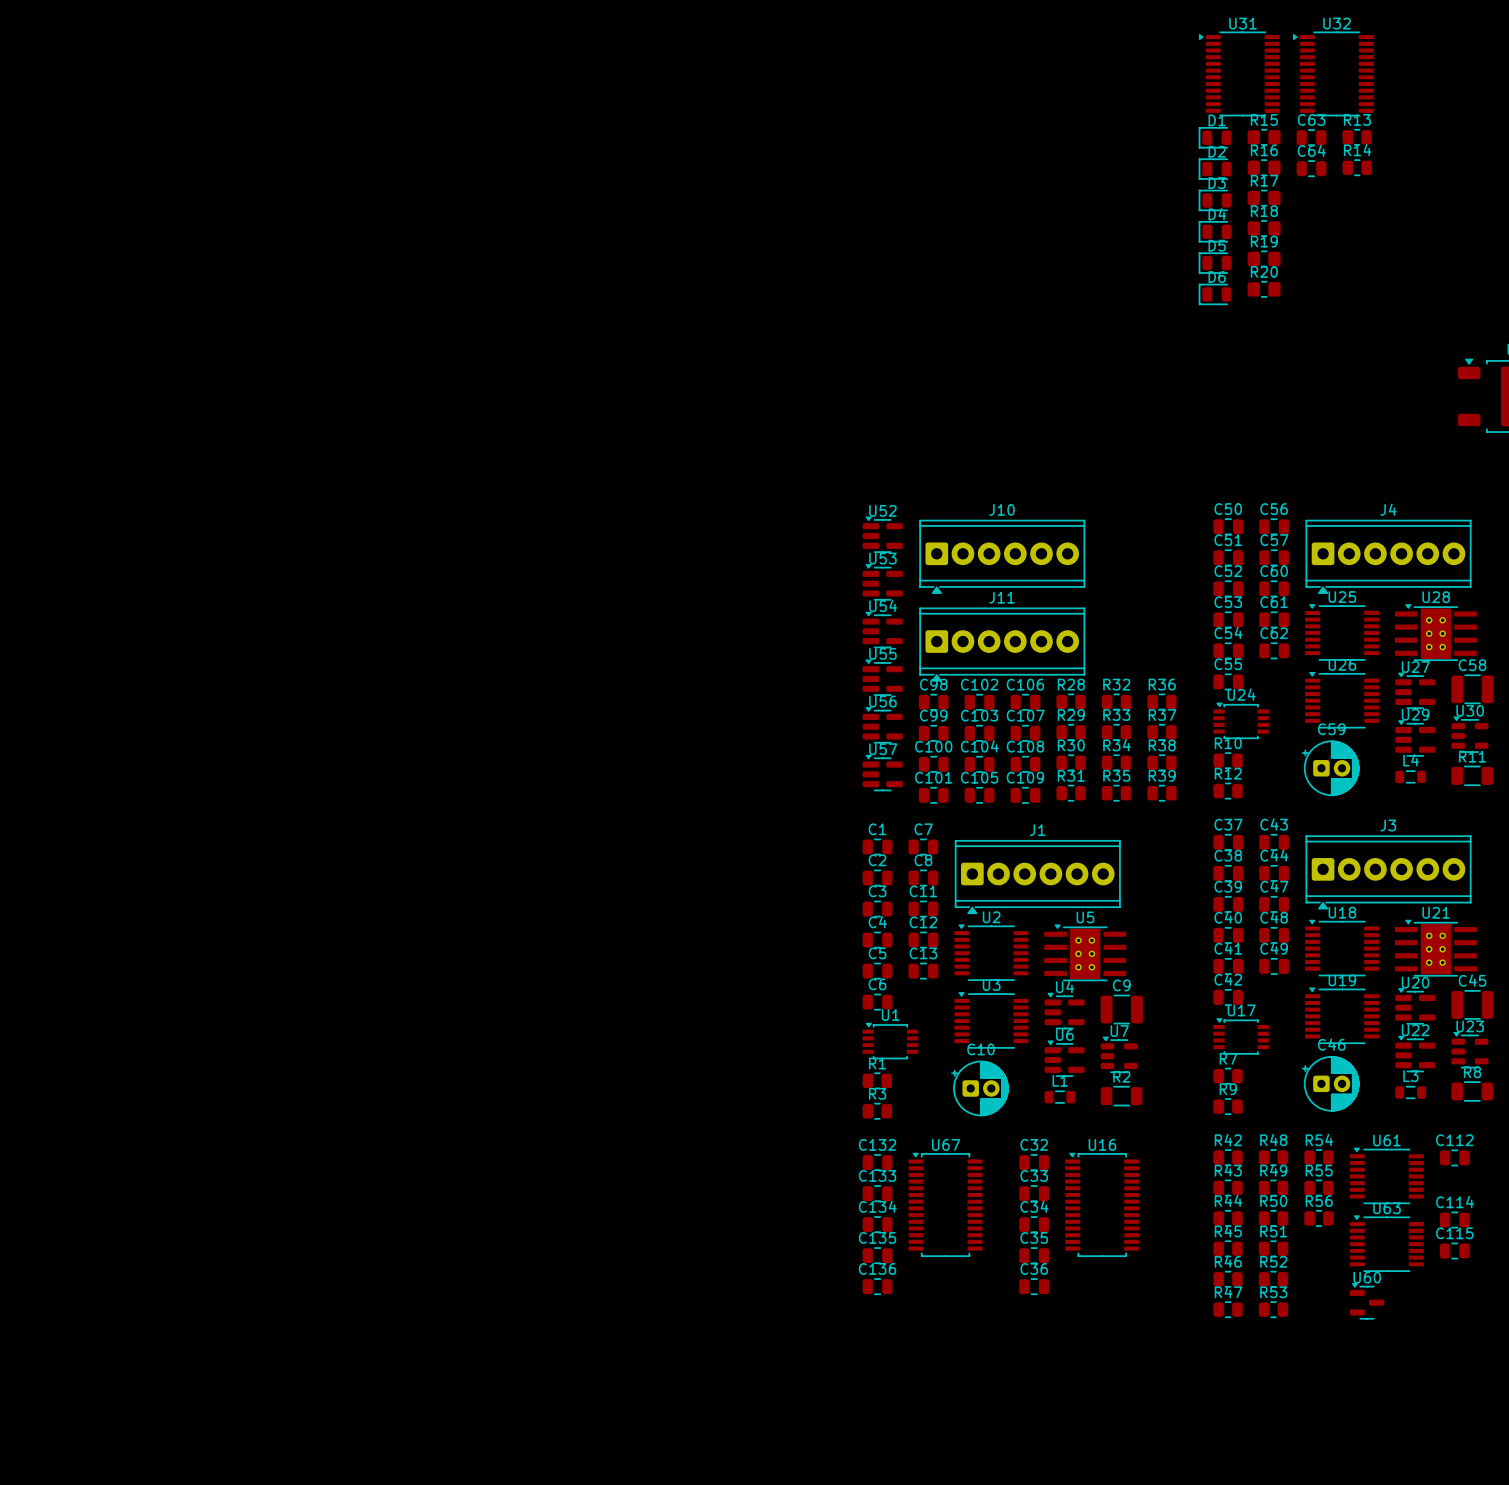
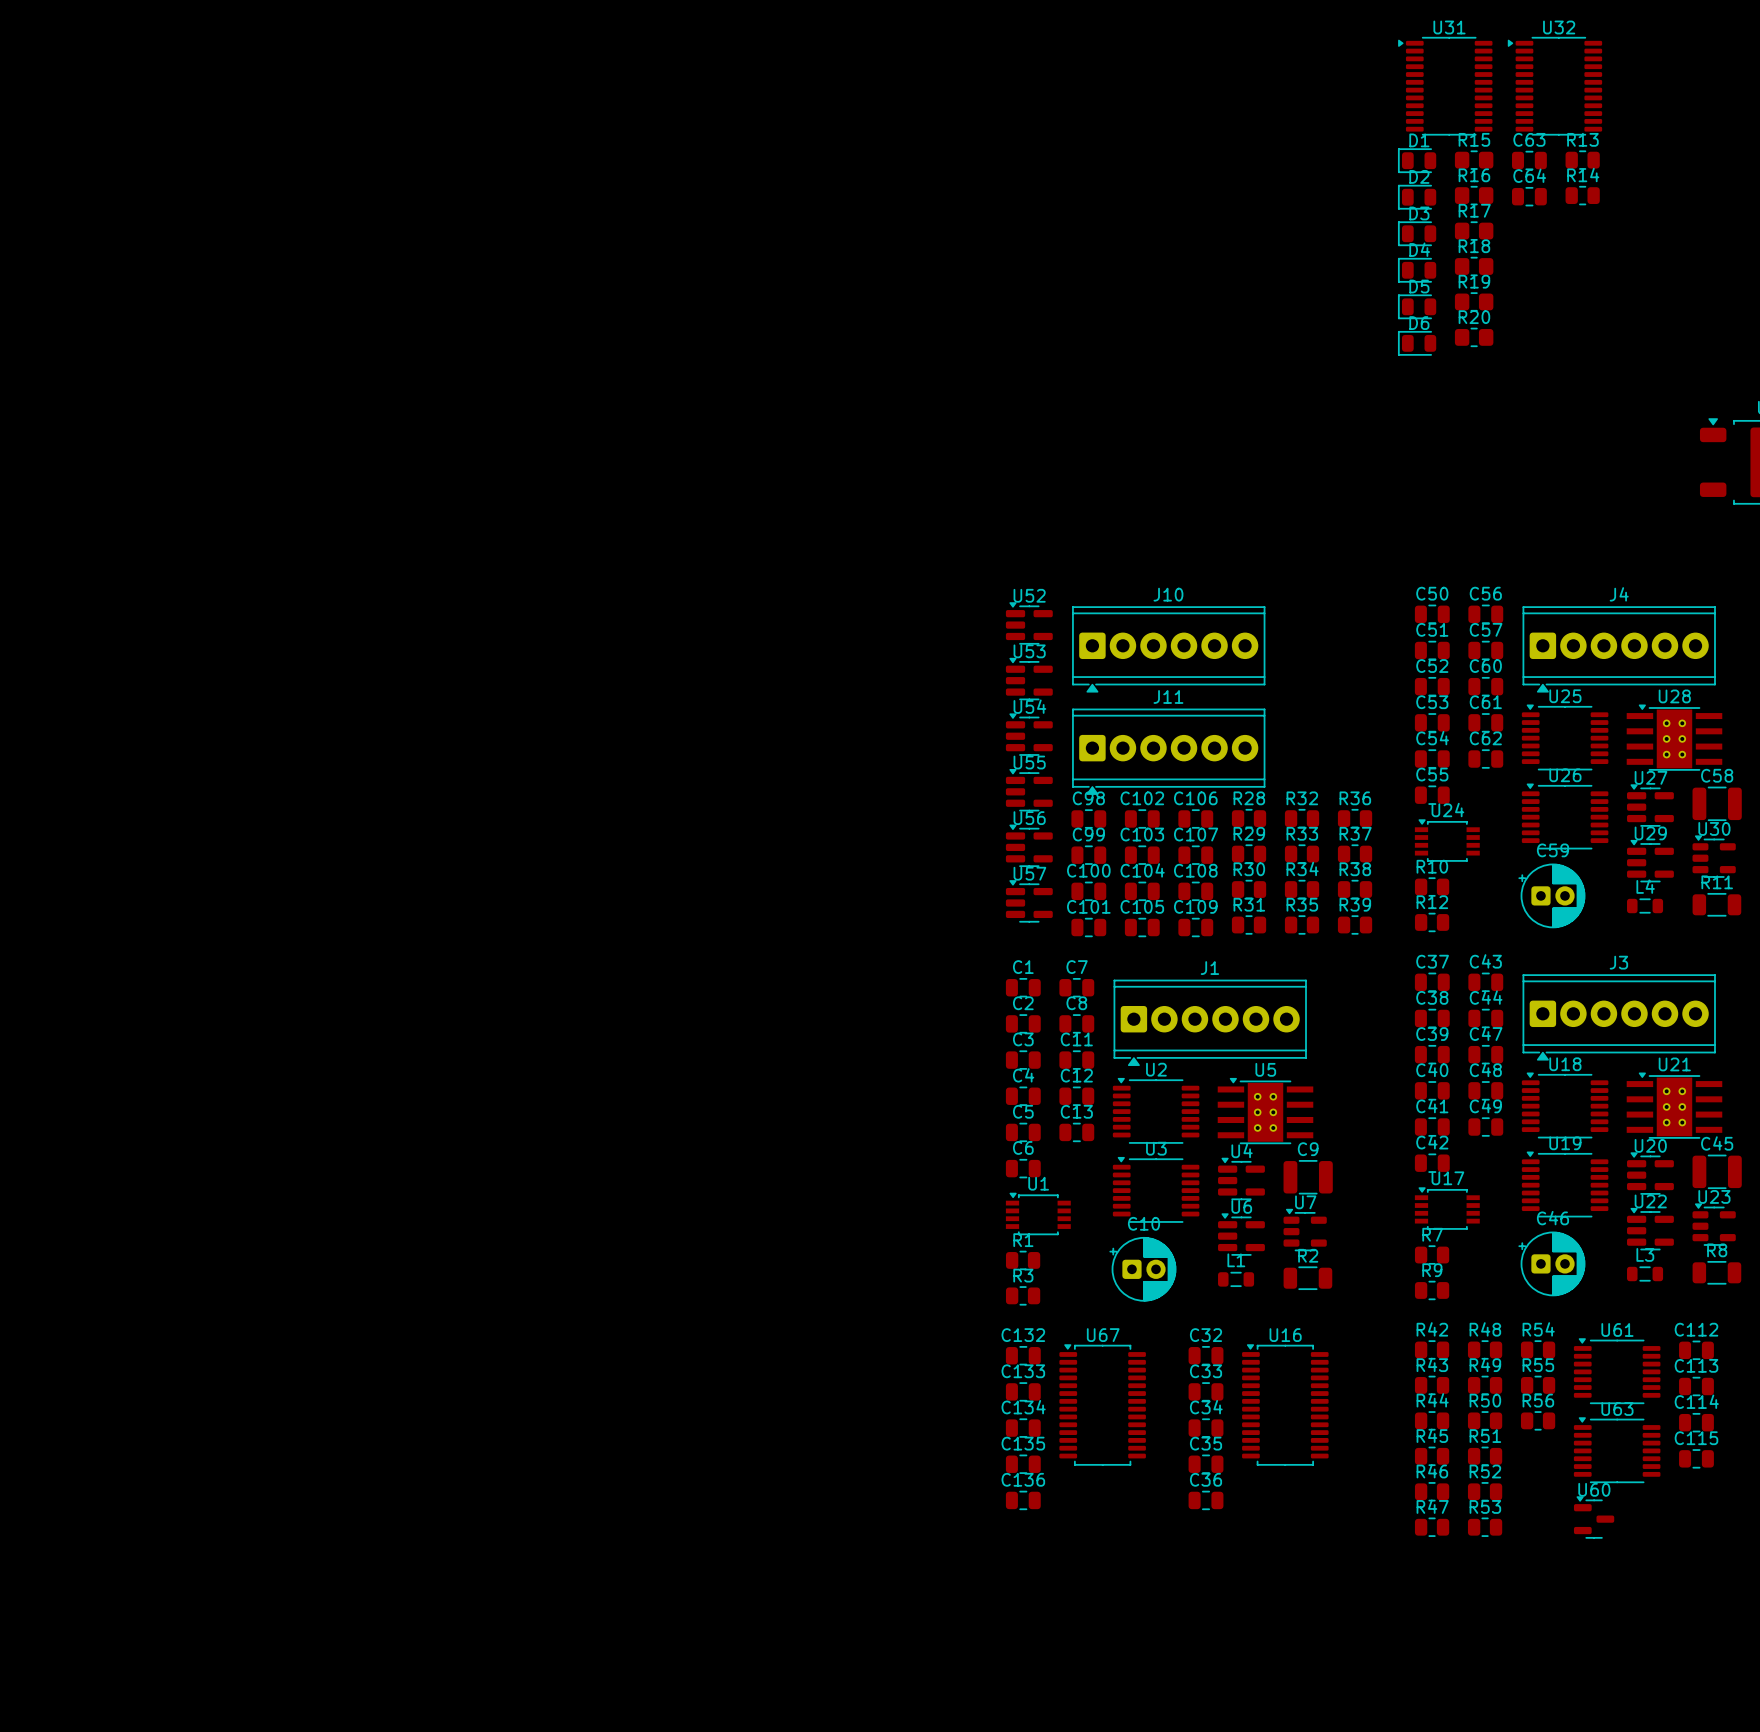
C113: none -> (1696, 1386)

